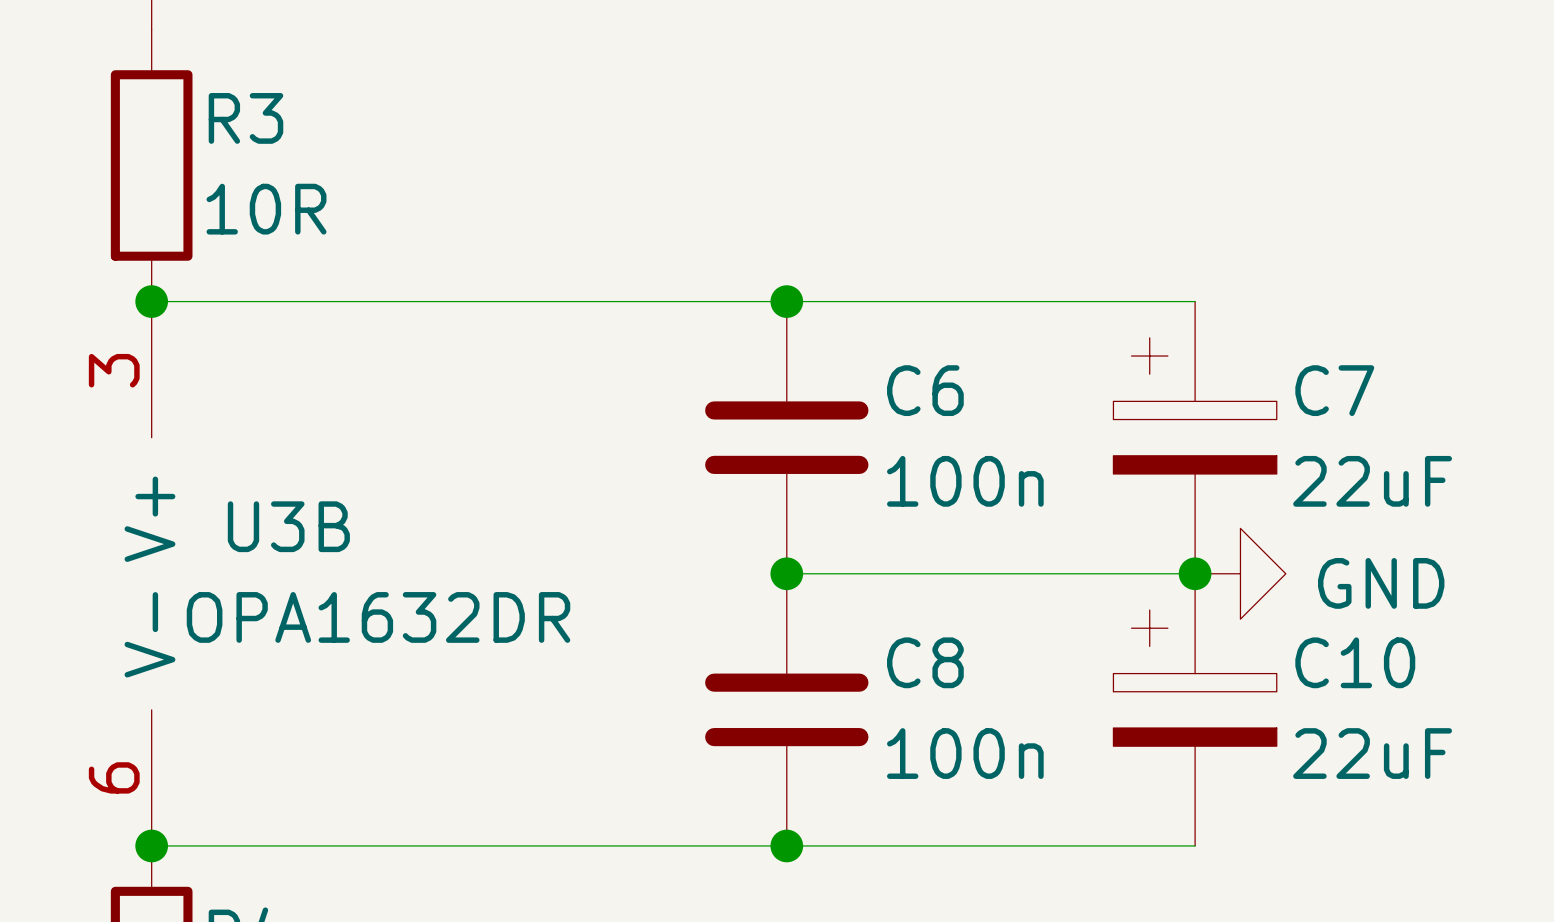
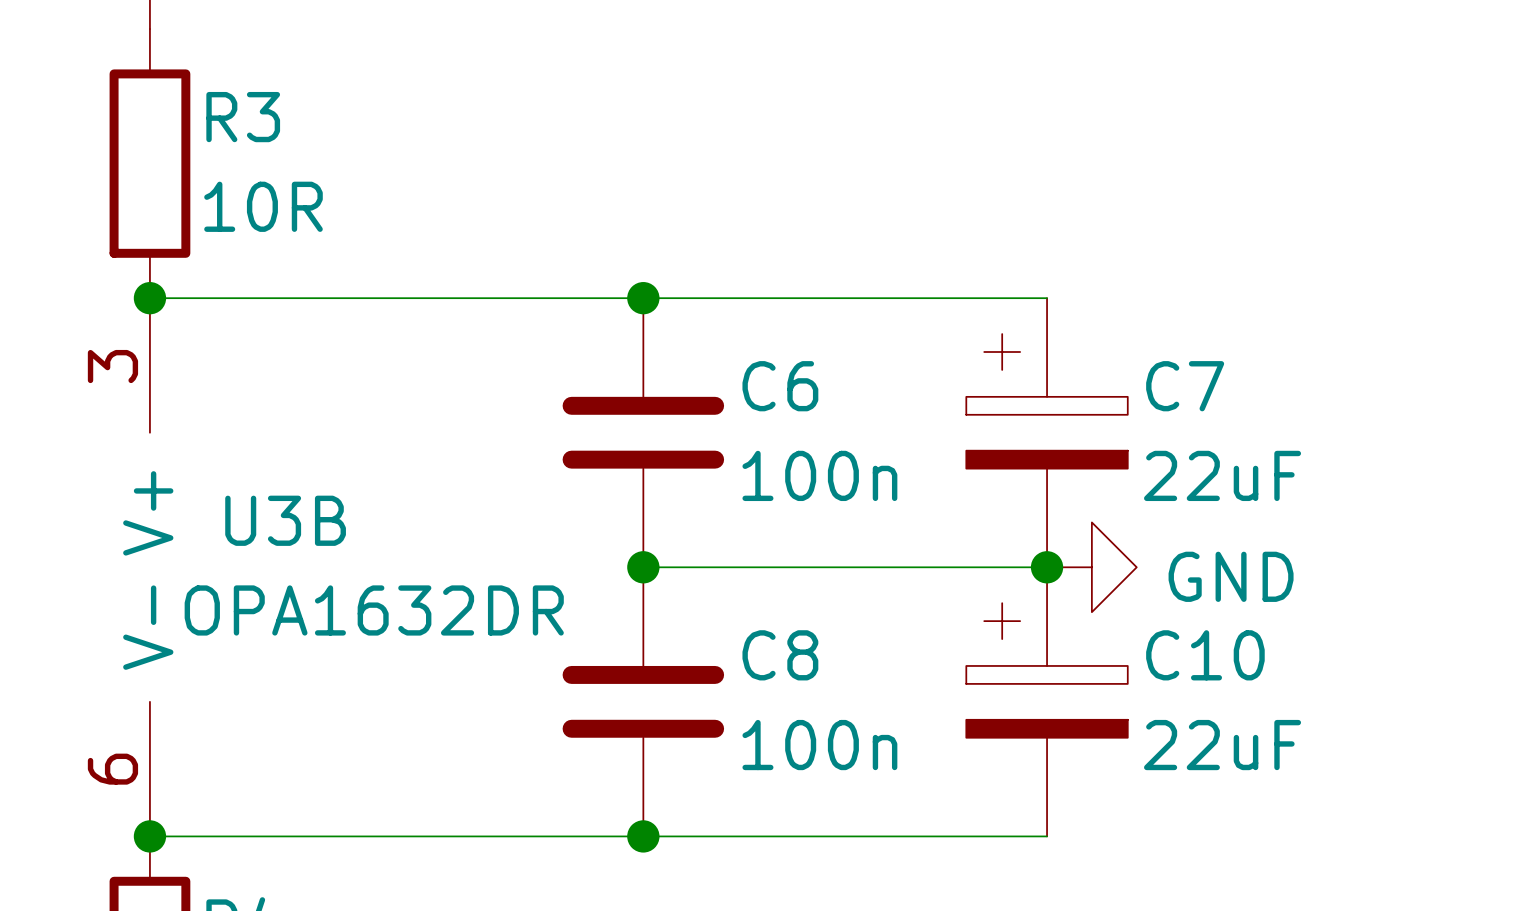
junction position: (786, 301) -> (643, 298)
wire: (1058, 301) (1195, 301) -> none
C6 position: (786, 437) -> (643, 432)
C7 position: (1195, 437) -> (1047, 432)
junction: none -> (643, 567)
junction: (786, 573) -> none
wire: (1058, 573) (1195, 573) -> (643, 567) (777, 567)
junction: none -> (1047, 567)
junction: (1195, 573) -> none
power symbol position: GND (1240, 573) -> GND (1091, 567)
C8 position: (786, 709) -> (643, 701)
C10 position: (1195, 709) -> (1047, 701)
junction position: (786, 845) -> (643, 836)
wire: (1058, 845) (1195, 845) -> none

